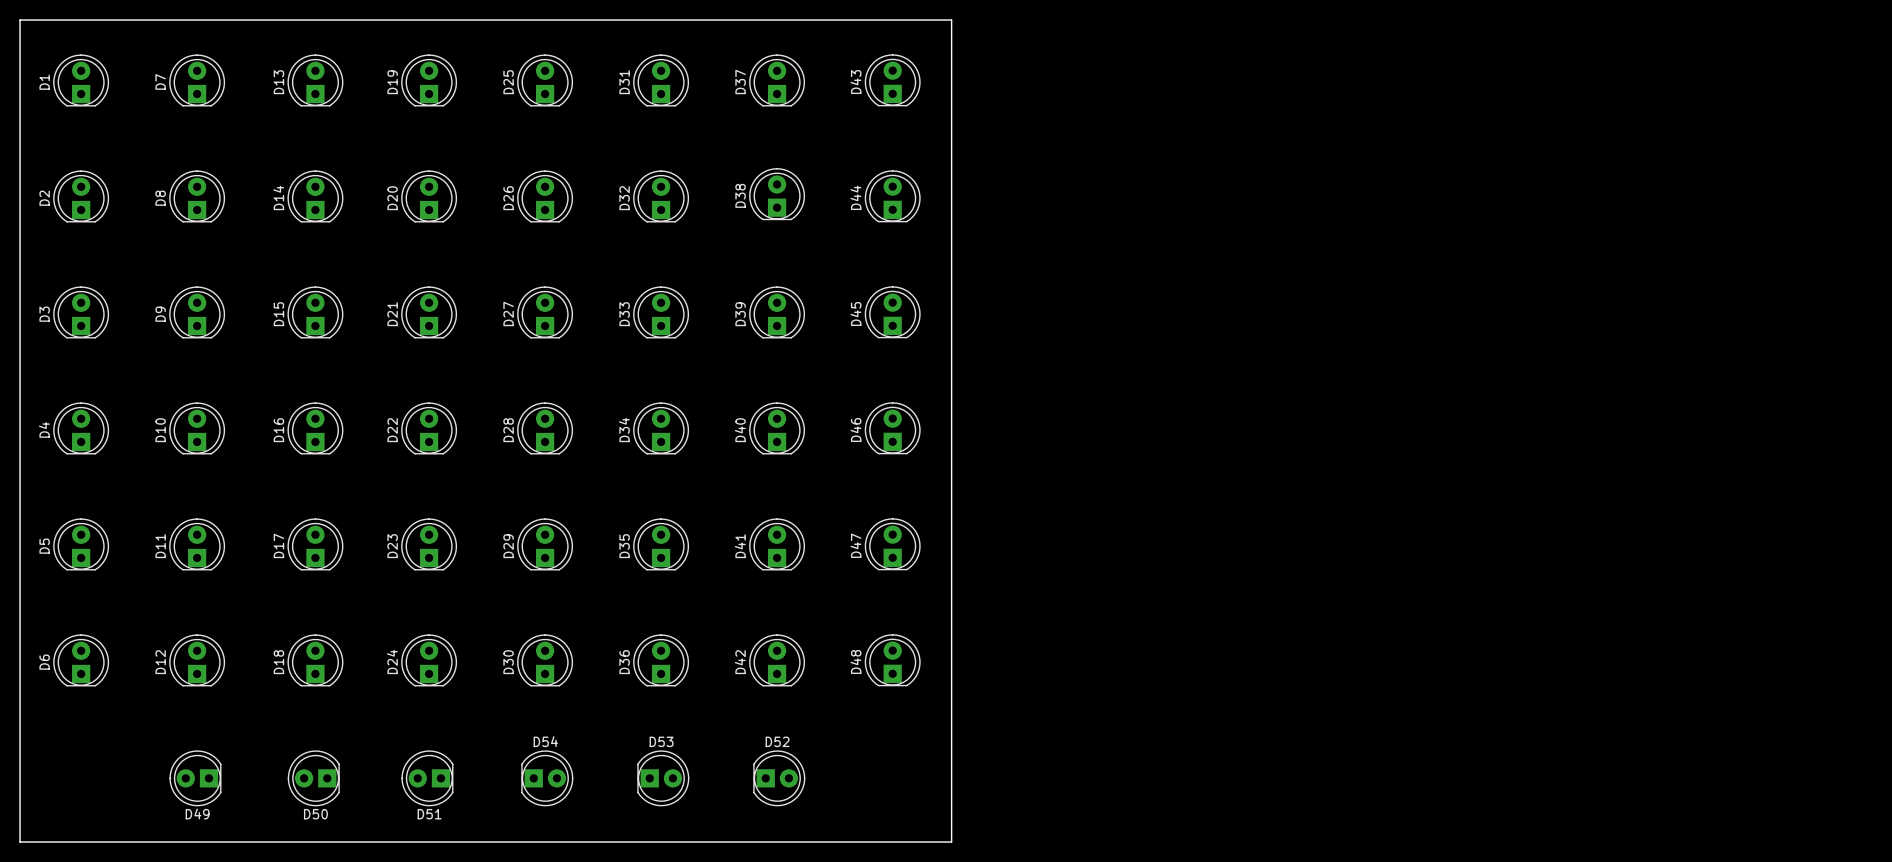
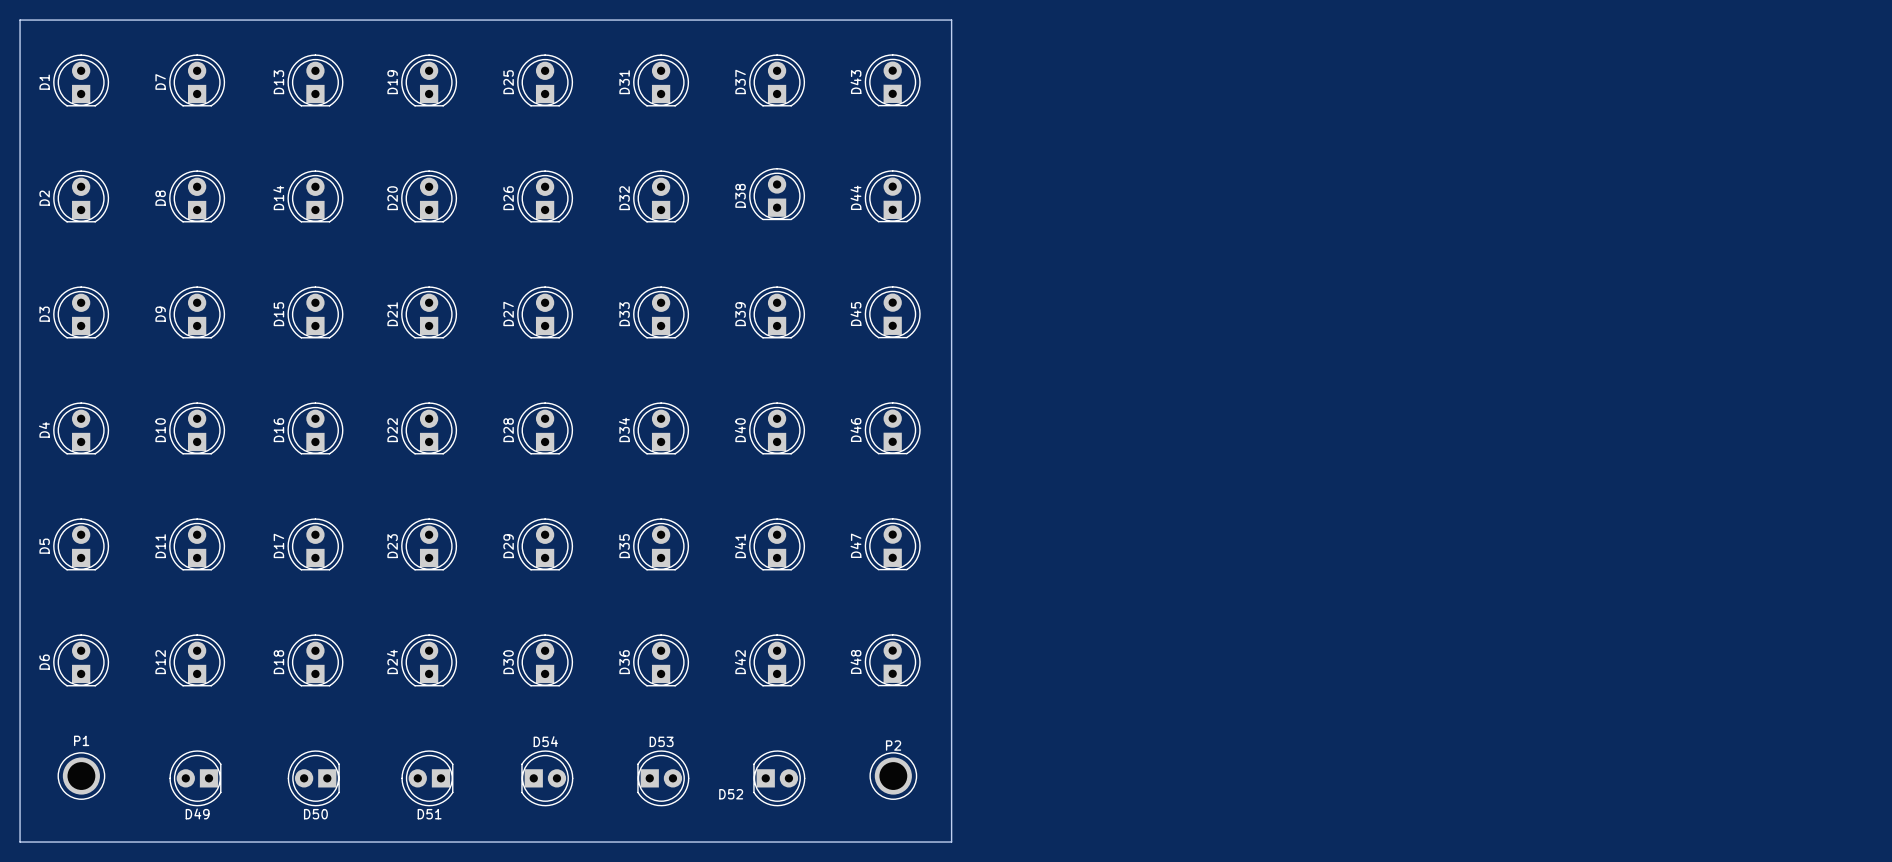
D52 name position: D52 (777, 741) -> D52 (731, 794)
P1: none -> (81, 776)
P2: none -> (893, 776)

